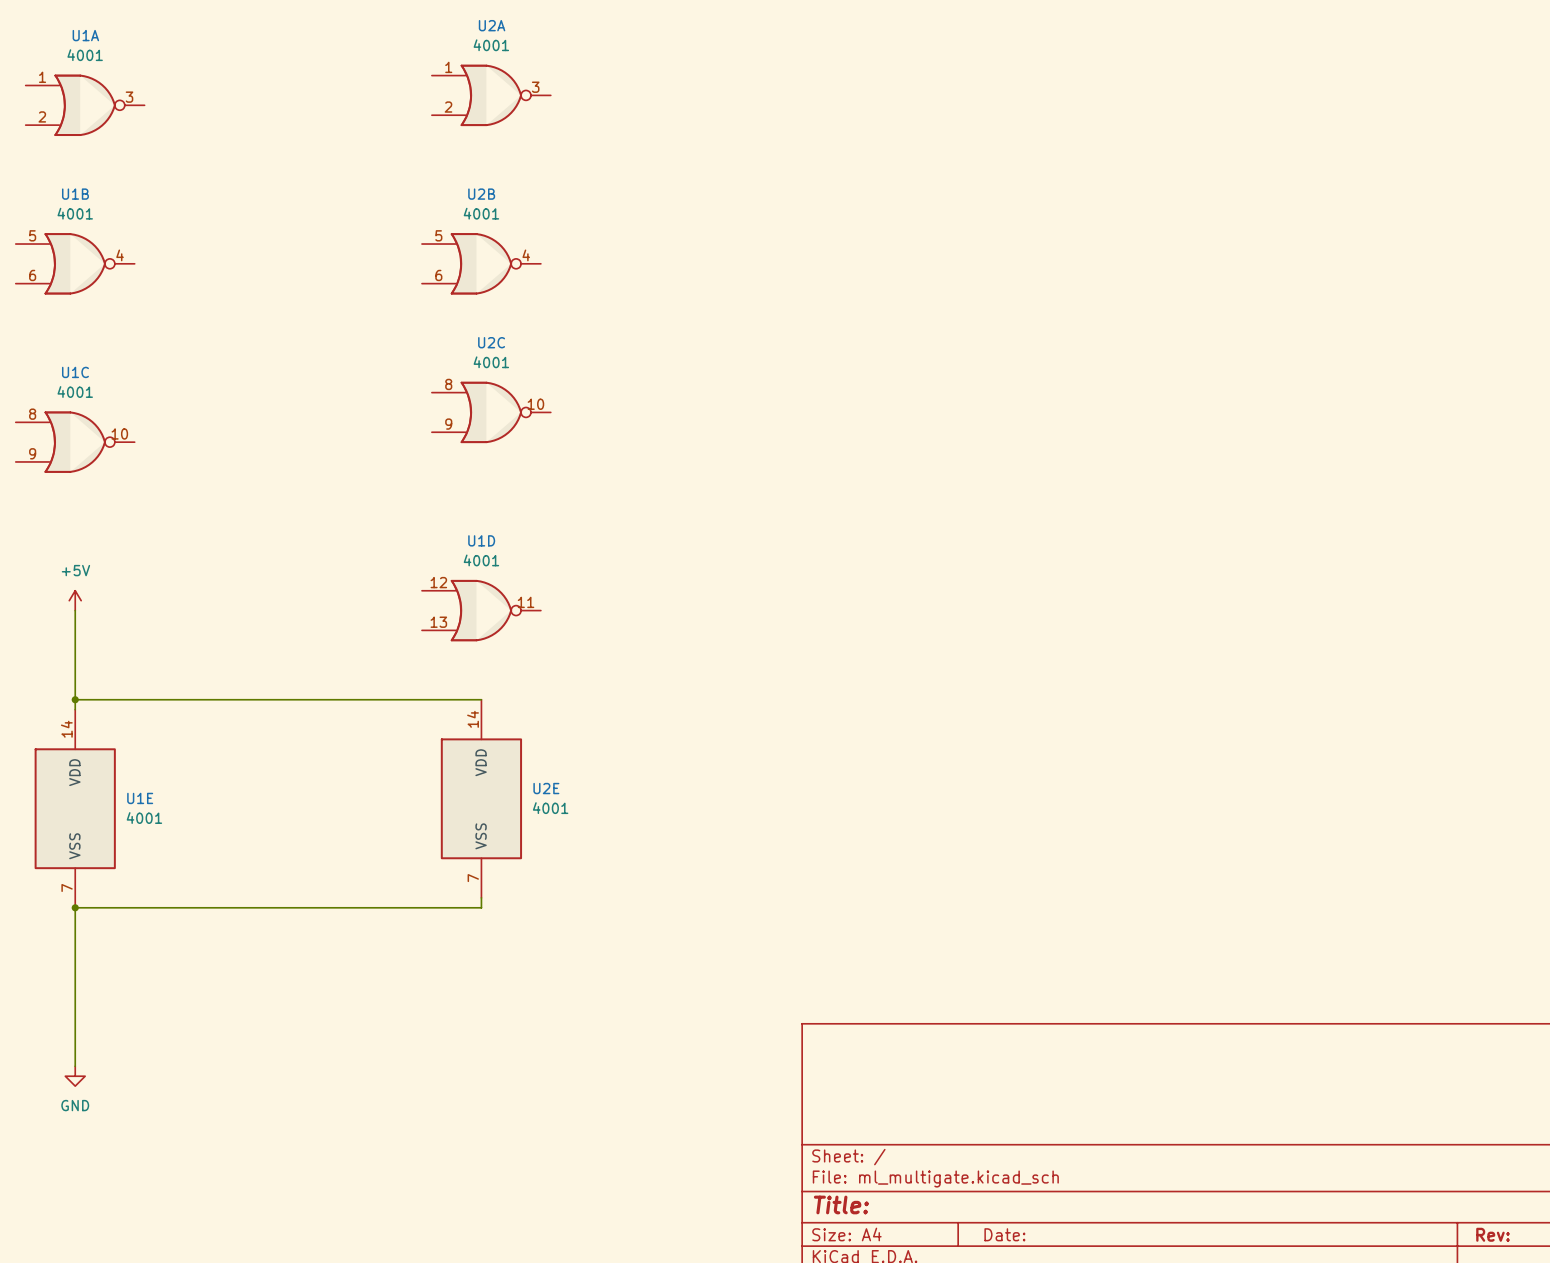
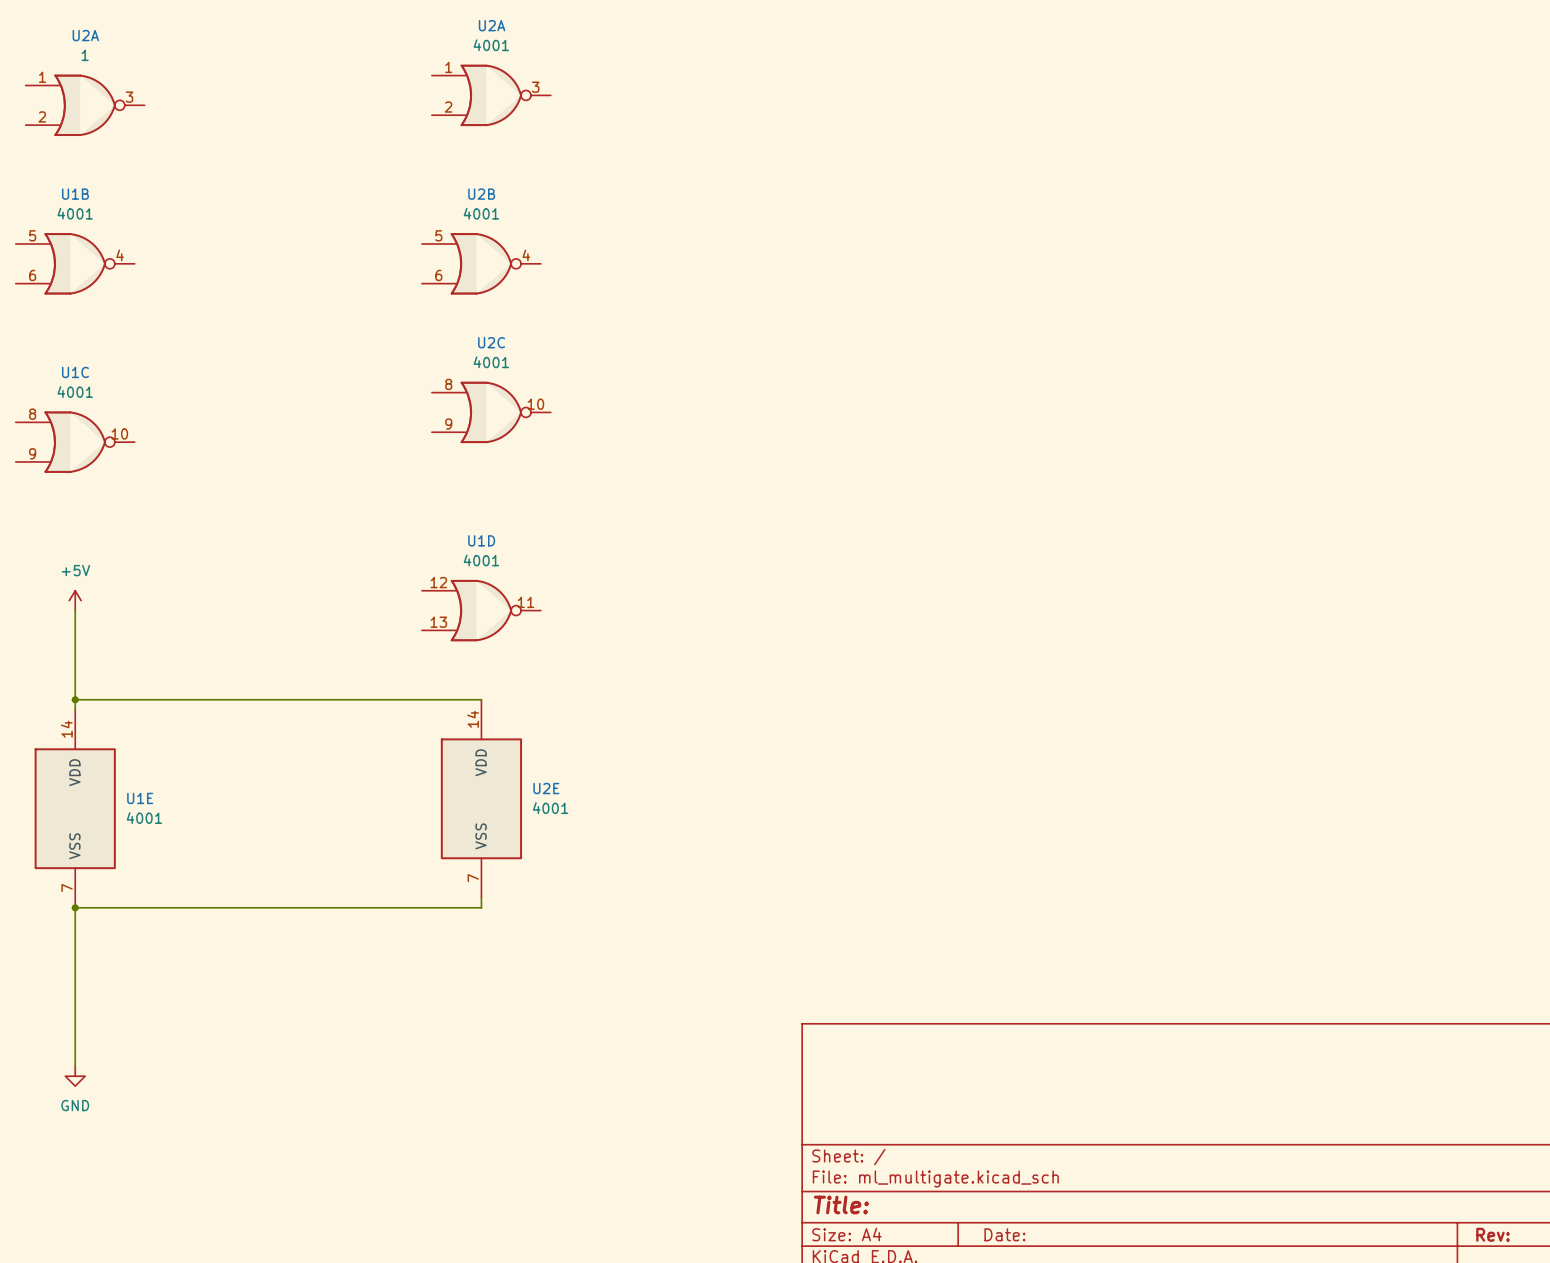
U1A name: U1A (85, 35) -> U2A (85, 35)
U1A value: 4001 (85, 55) -> 1 (85, 55)

